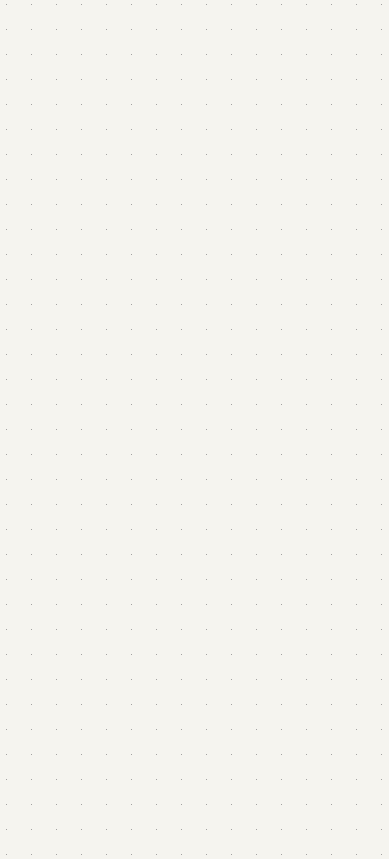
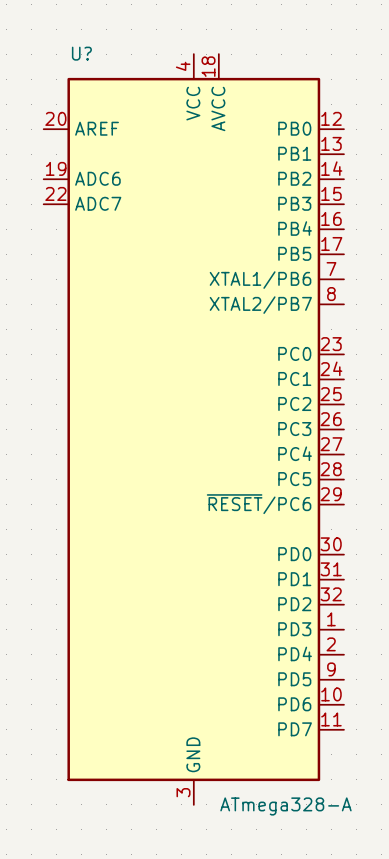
U?: none -> ATmega328-A (193, 429)

